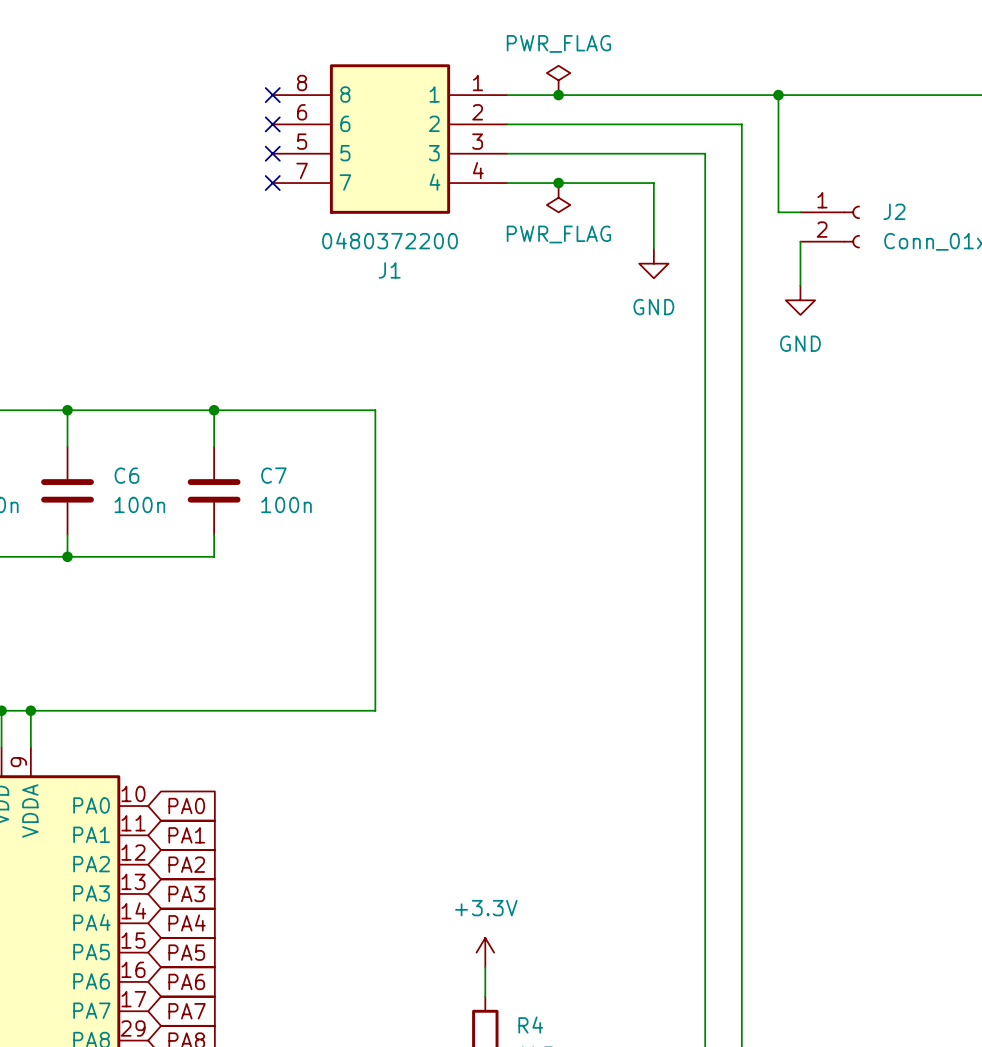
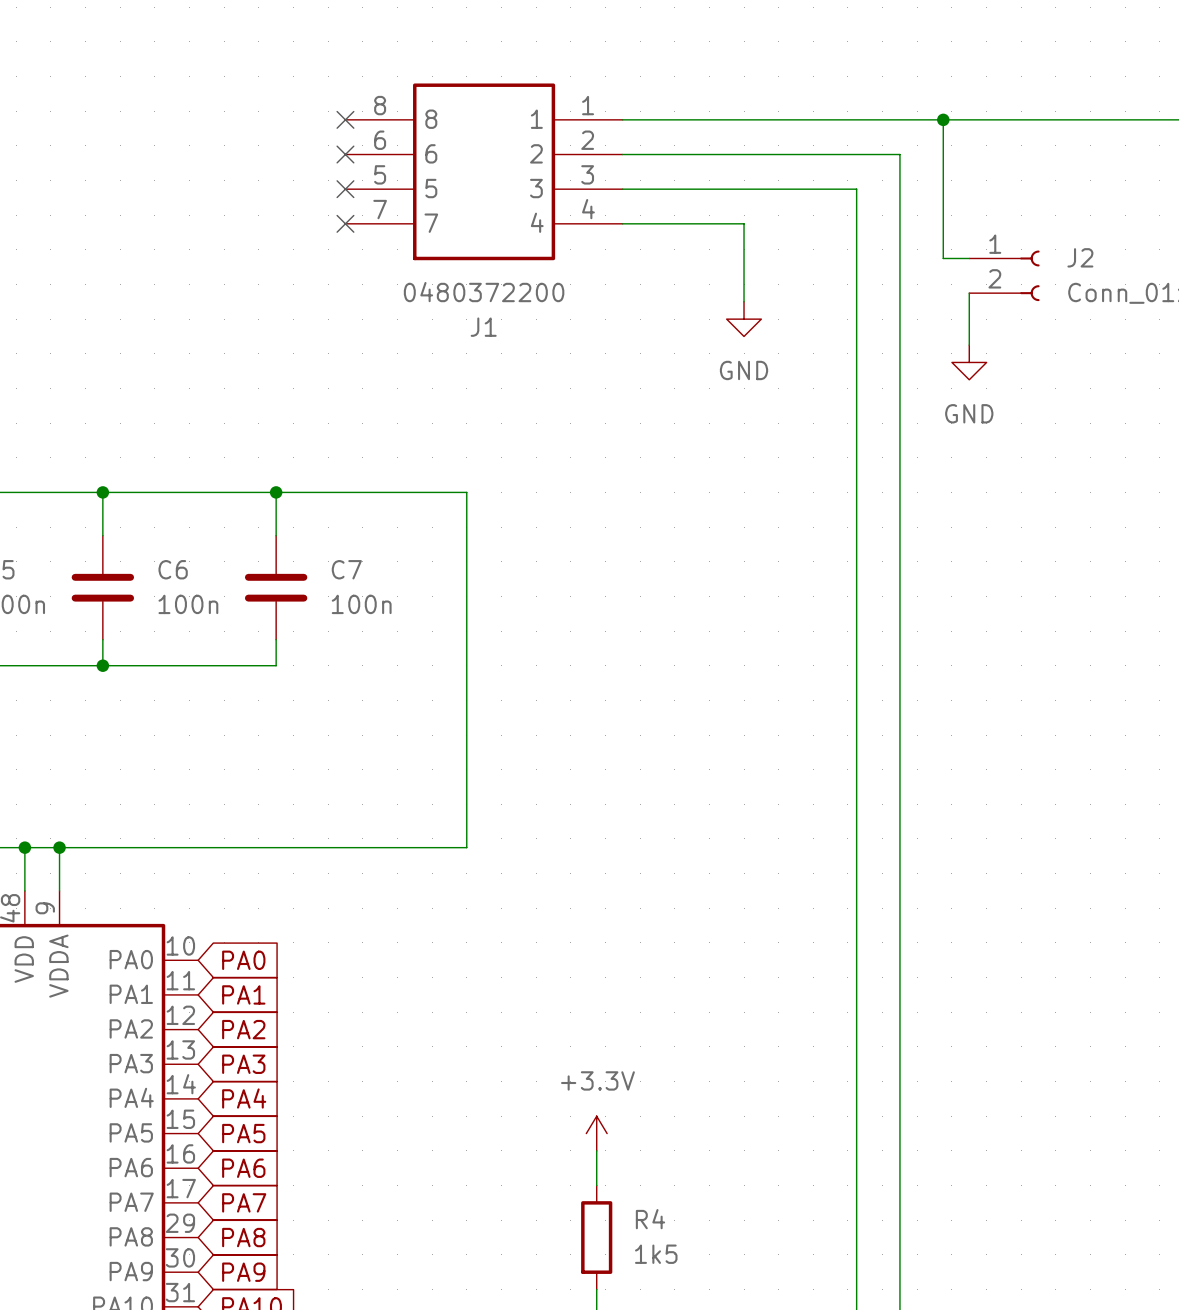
power symbol: PWR_FLAG (558, 80) -> none
junction: (558, 95) -> none
junction: (558, 183) -> none
wire: (609, 183) (653, 183) (653, 248) -> (744, 223) (744, 301)
power symbol: PWR_FLAG (558, 197) -> none
power symbol position: GND (653, 263) -> GND (744, 319)

